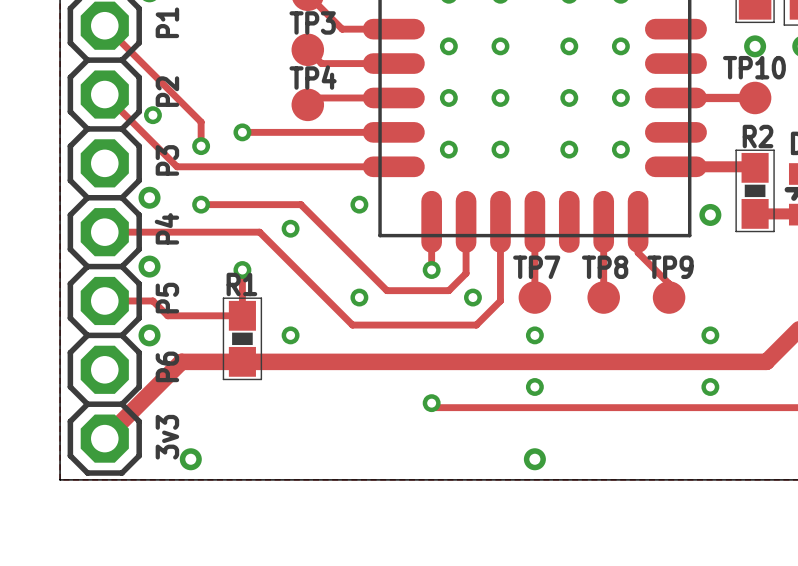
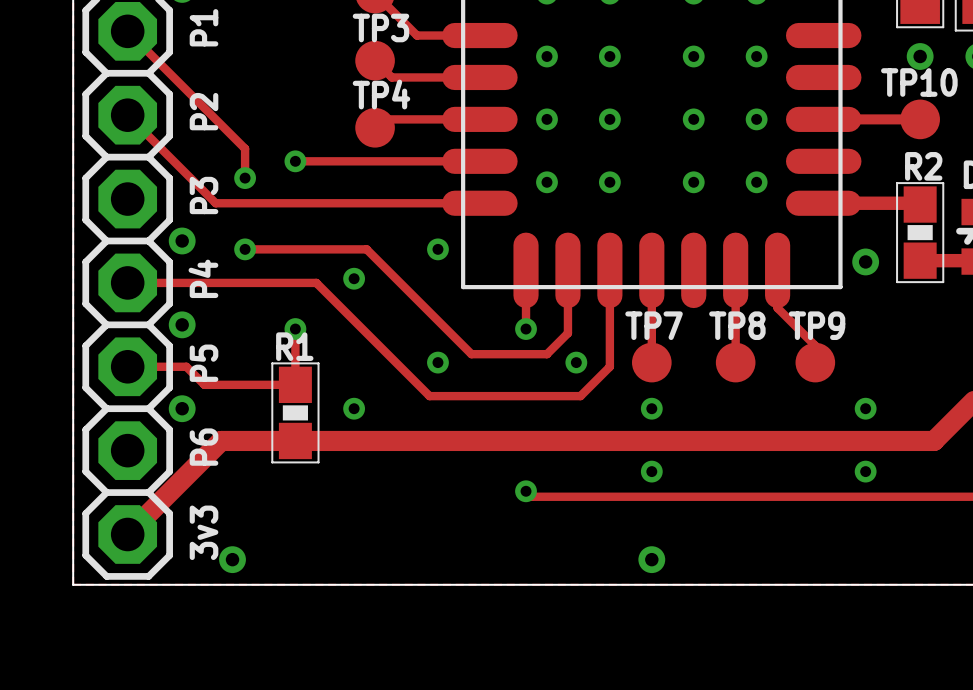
via: (152, 115) -> none

